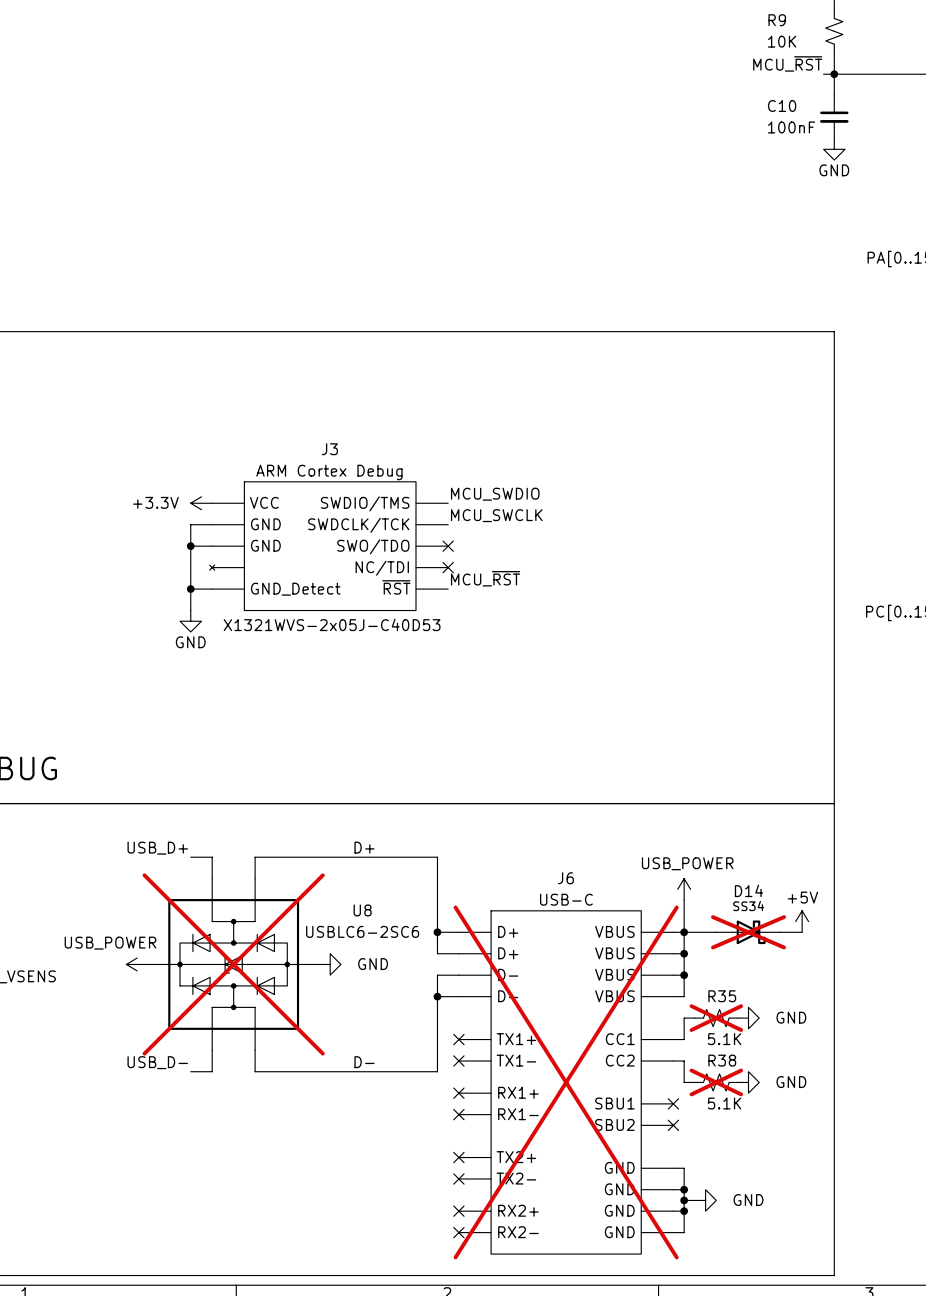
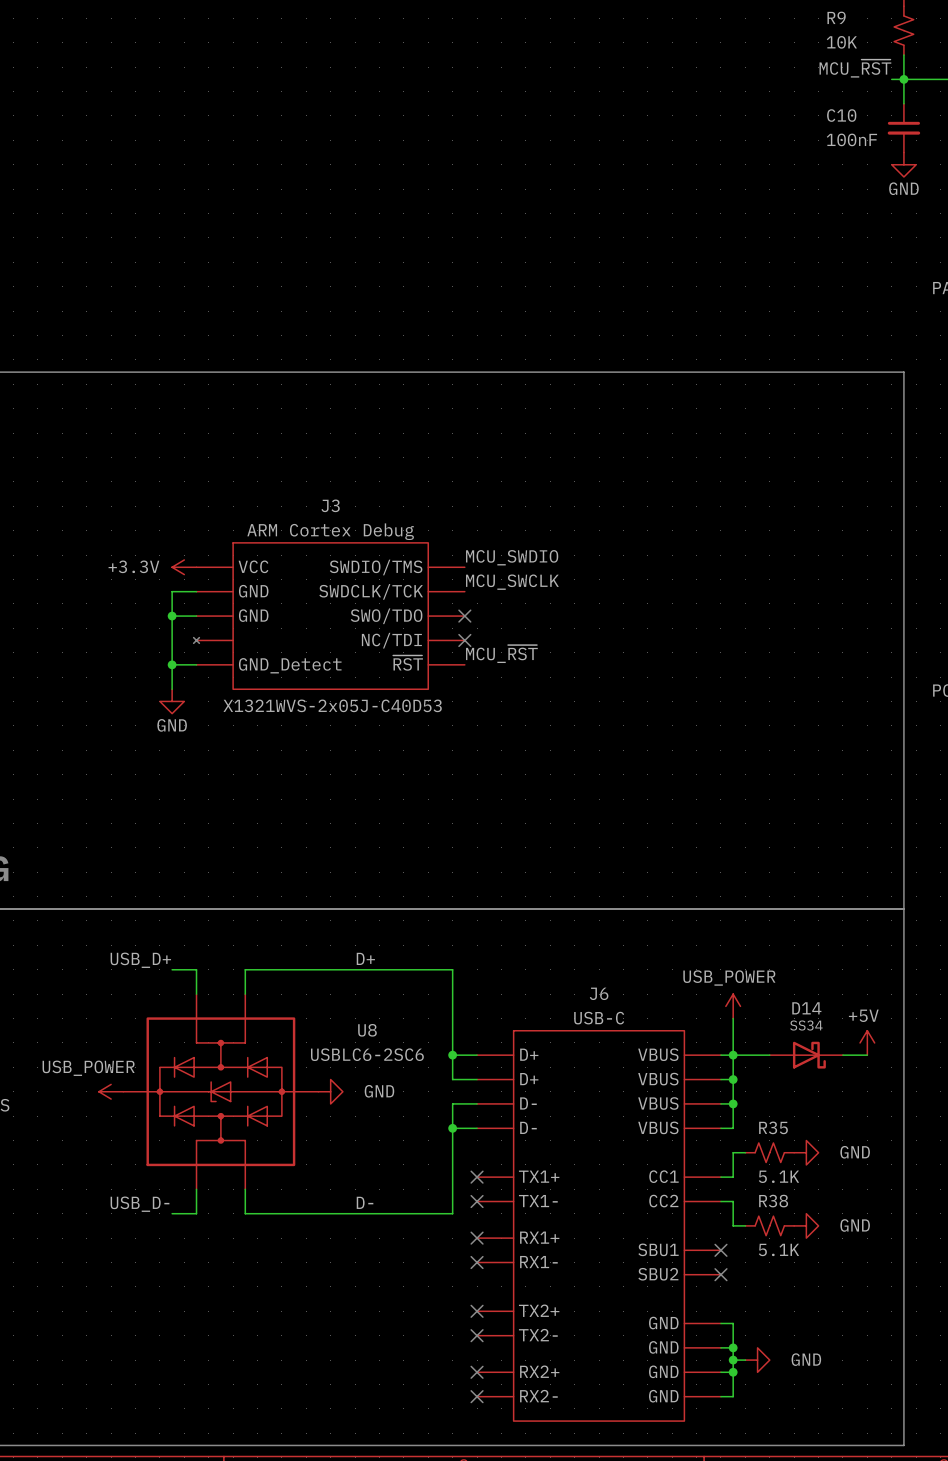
D14 do-not-place cross: (748, 932) -> none
U8 do-not-place cross: (233, 964) -> none
R35 do-not-place cross: (716, 1018) -> none
J6 do-not-place cross: (566, 1082) -> none
R38 do-not-place cross: (716, 1082) -> none

